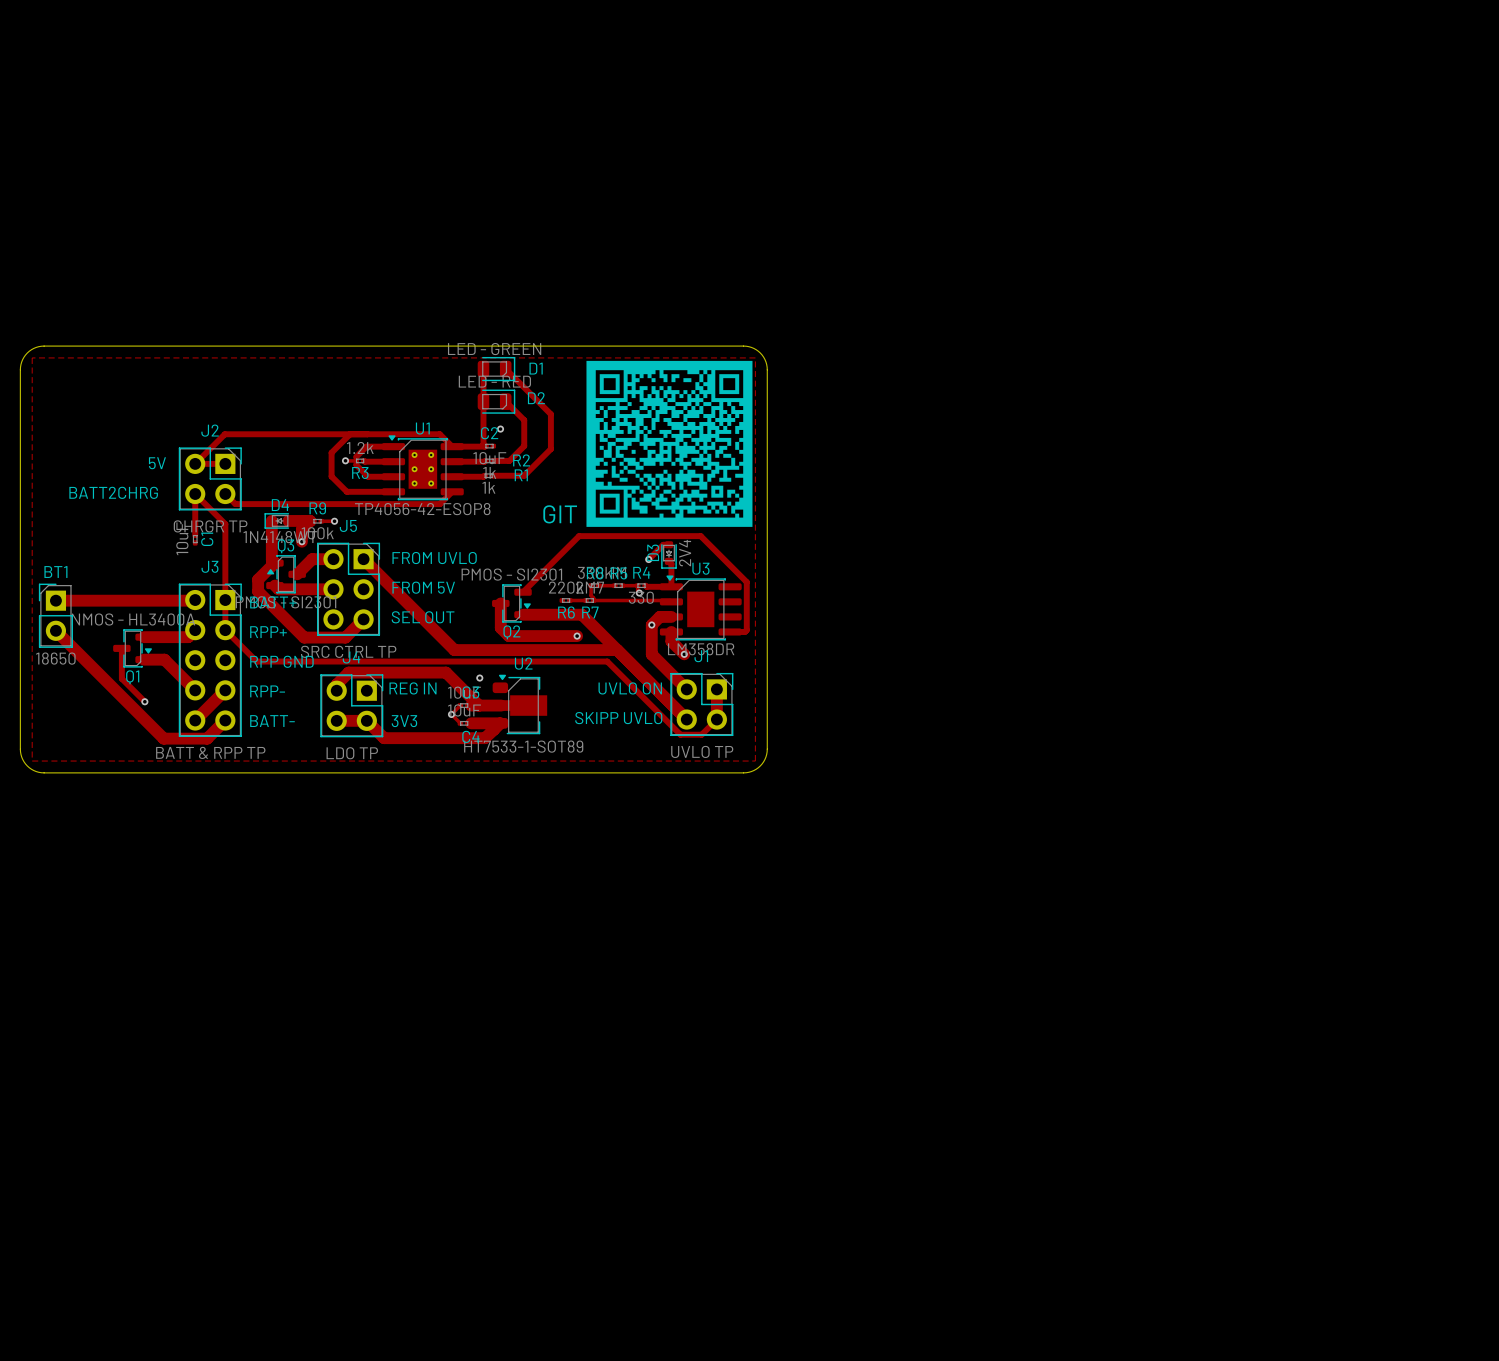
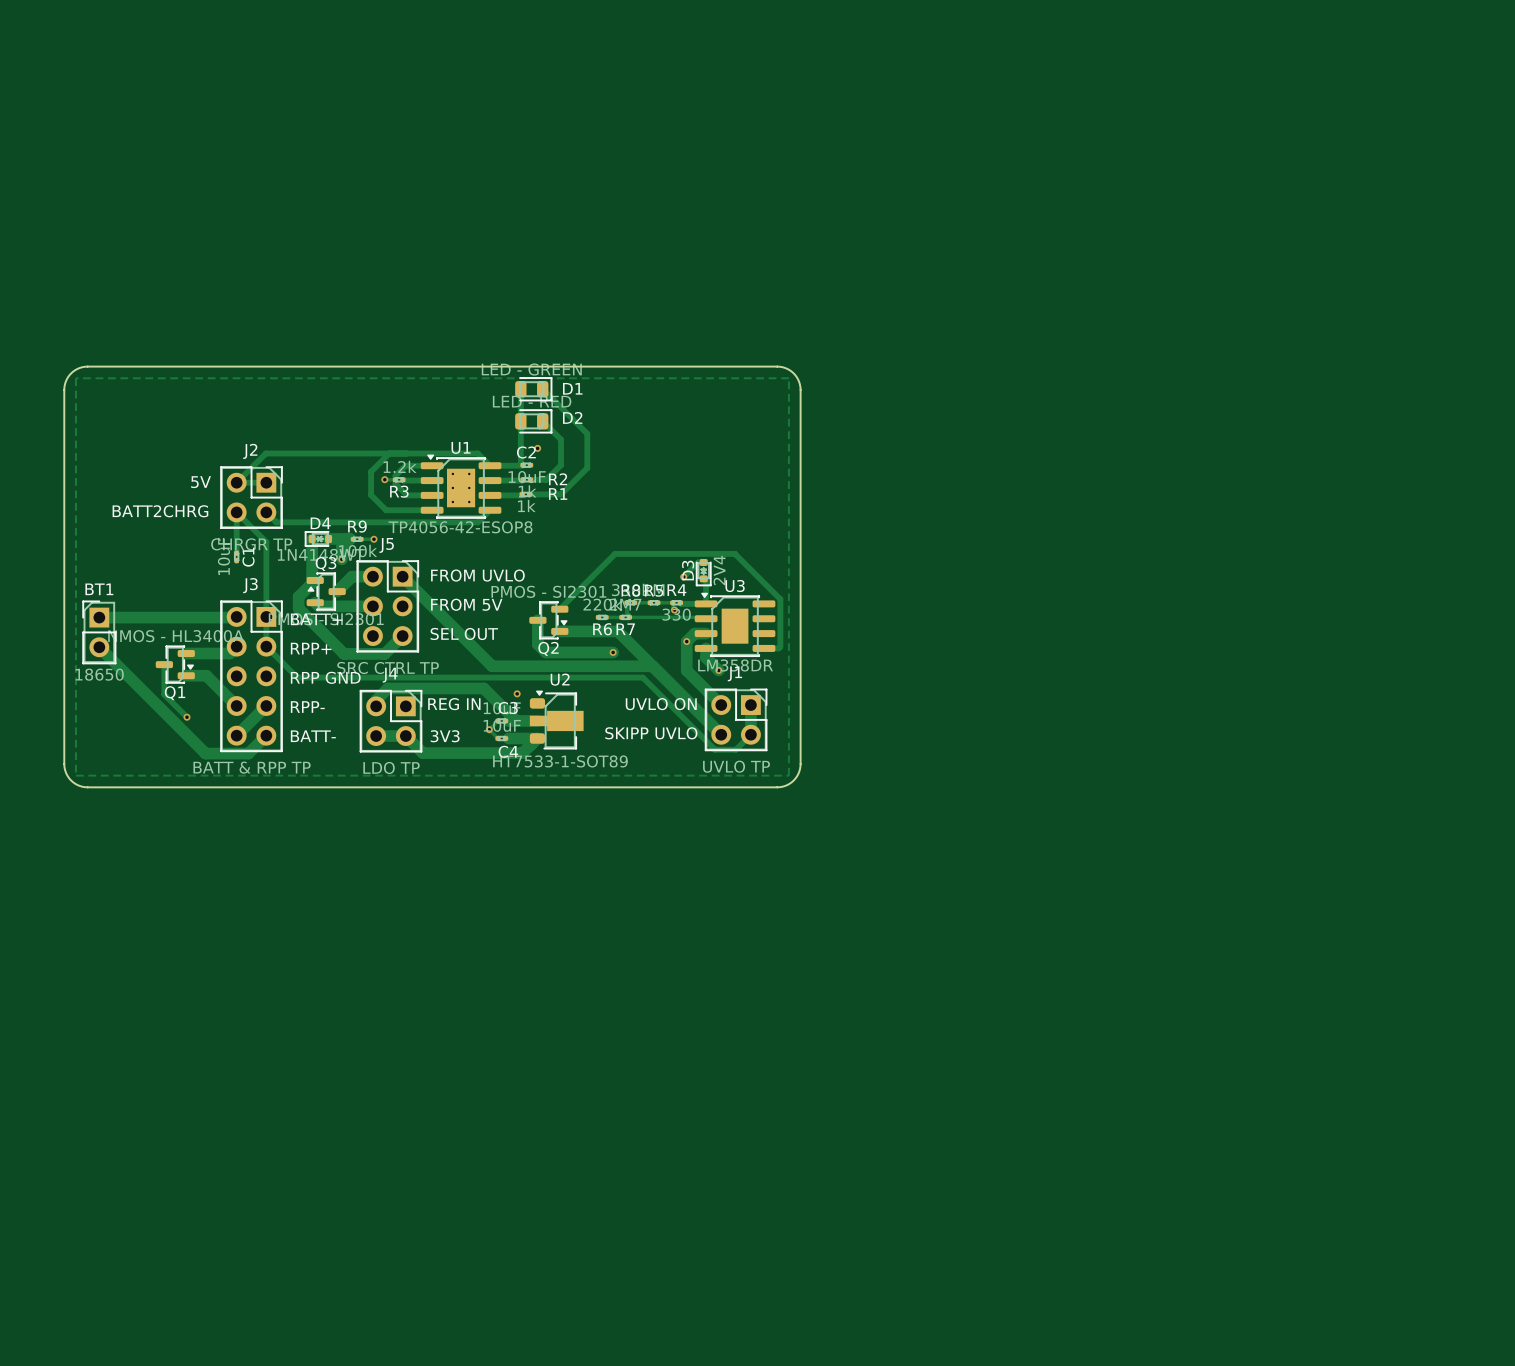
GIT: (669, 443) -> none

